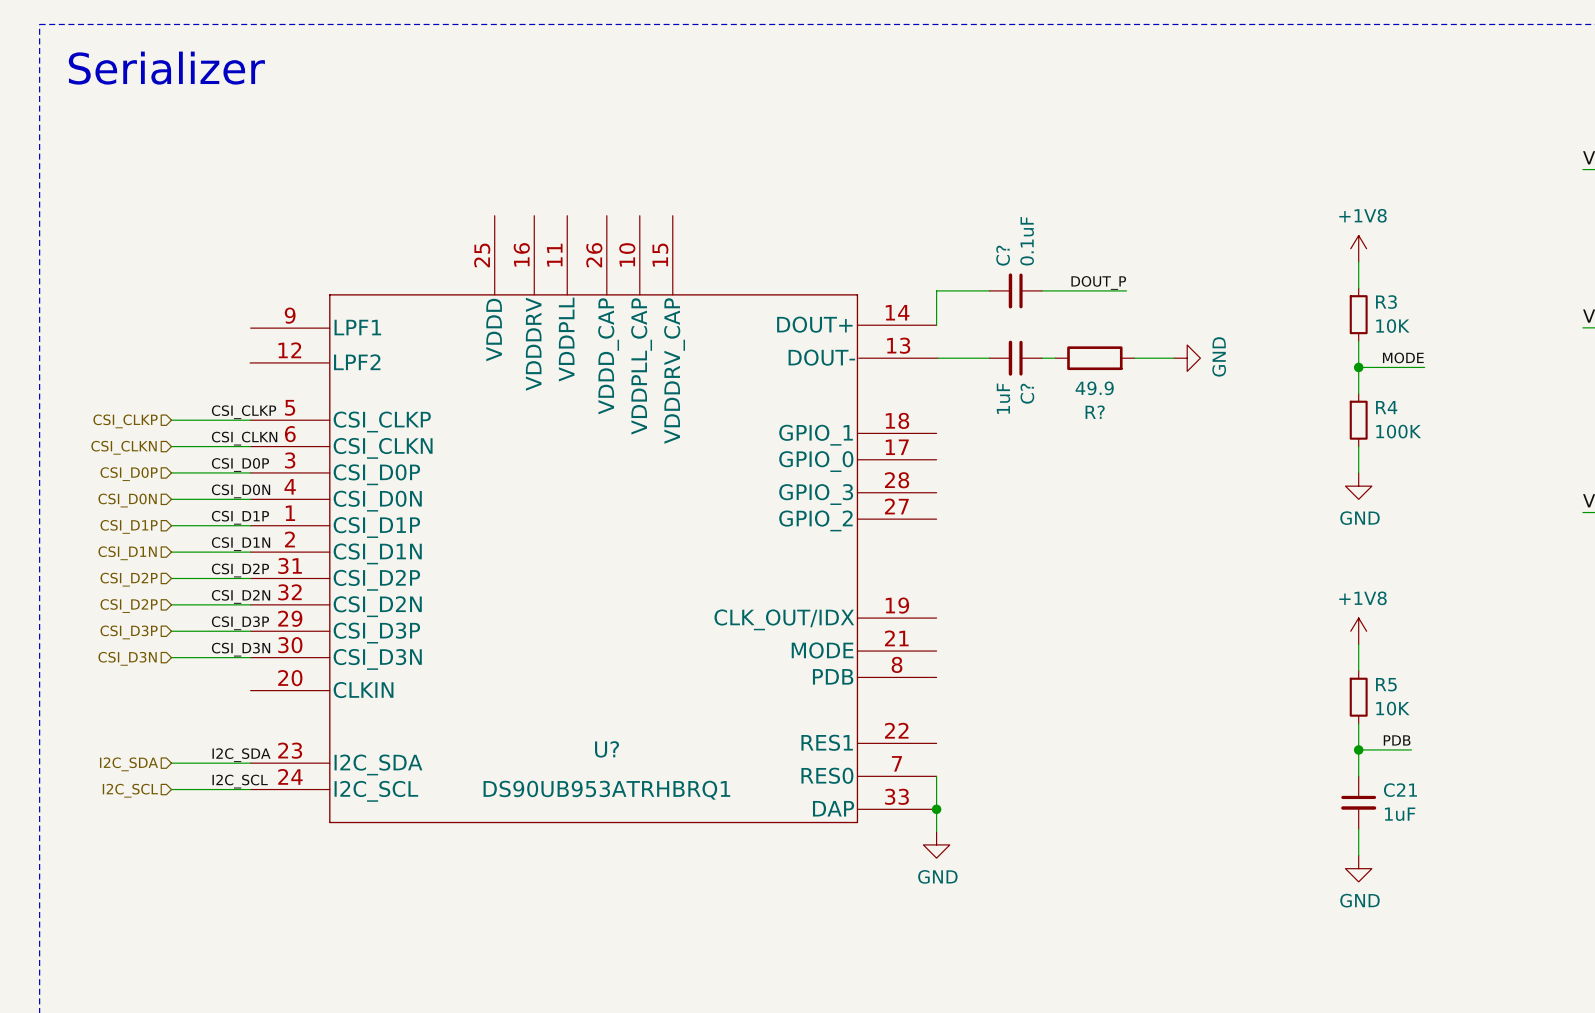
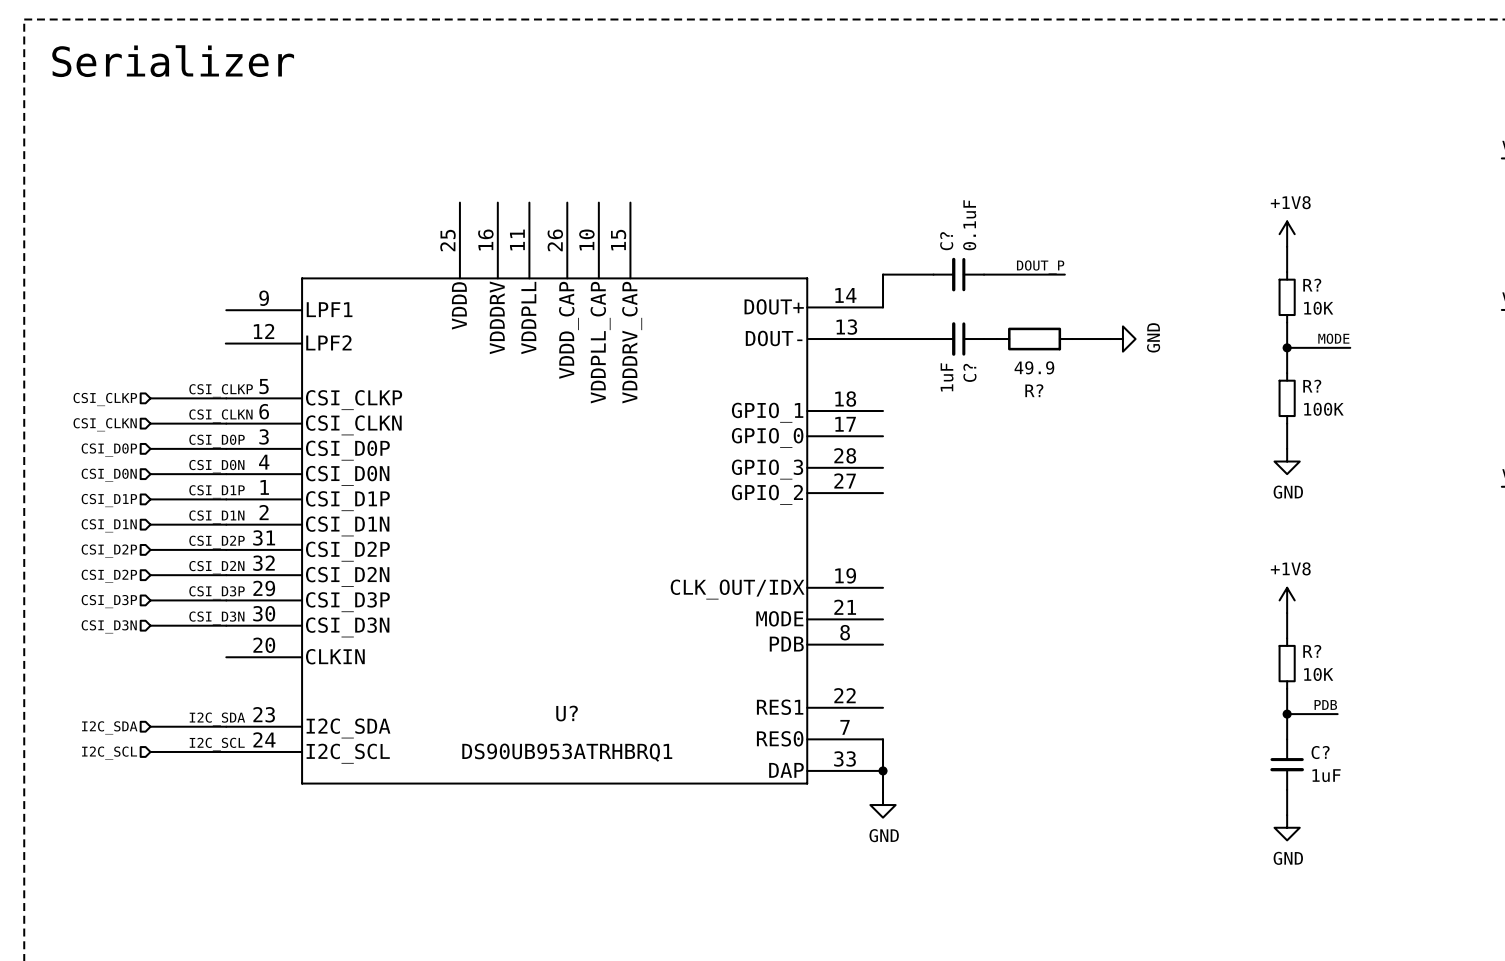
R3 name: R3 (1386, 302) -> R? (1312, 285)
R4 name: R4 (1386, 407) -> R? (1312, 386)
R5 name: R5 (1386, 684) -> R? (1312, 651)
C21 name: C21 (1400, 790) -> C? (1320, 752)

